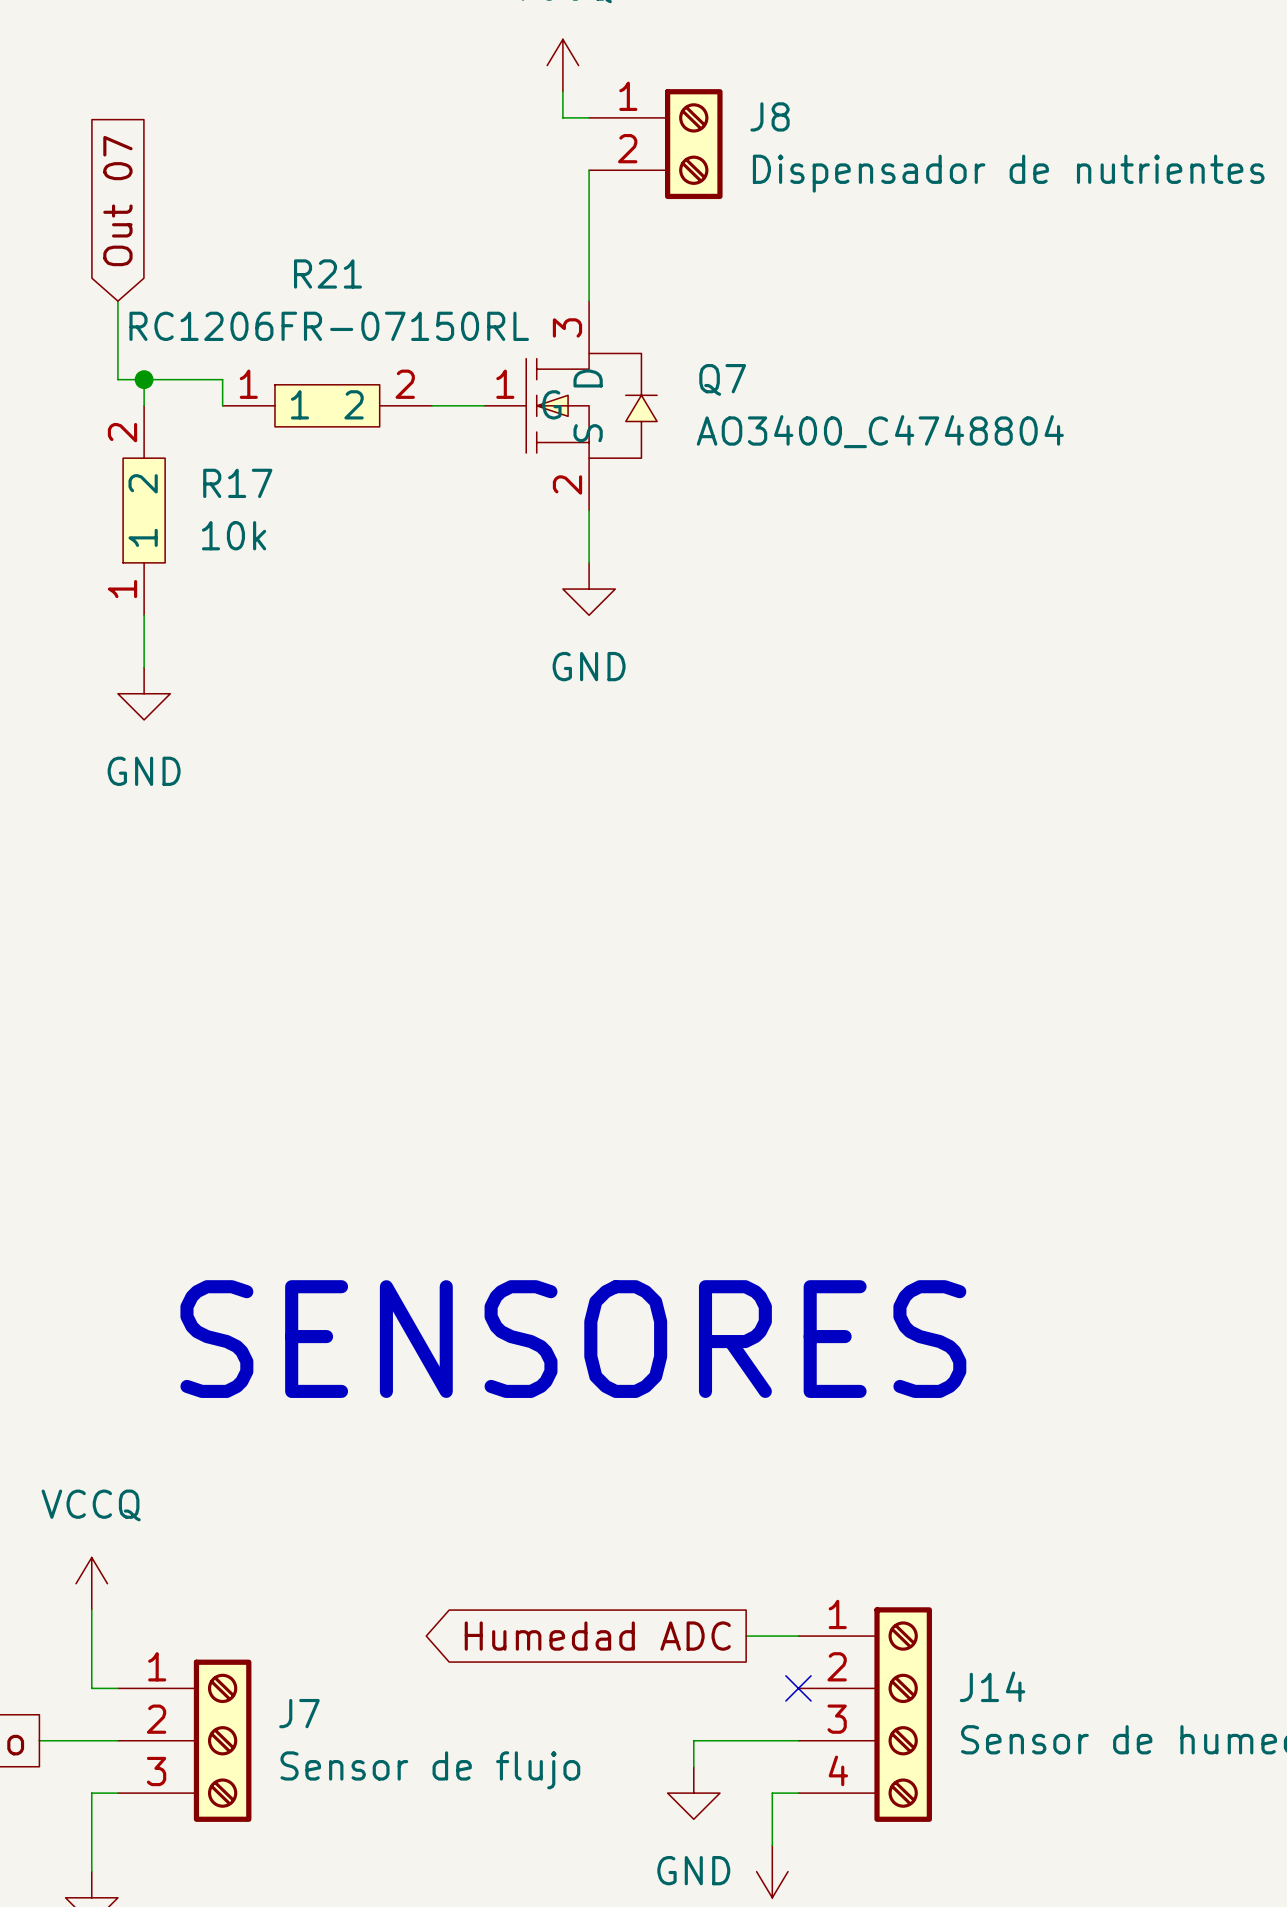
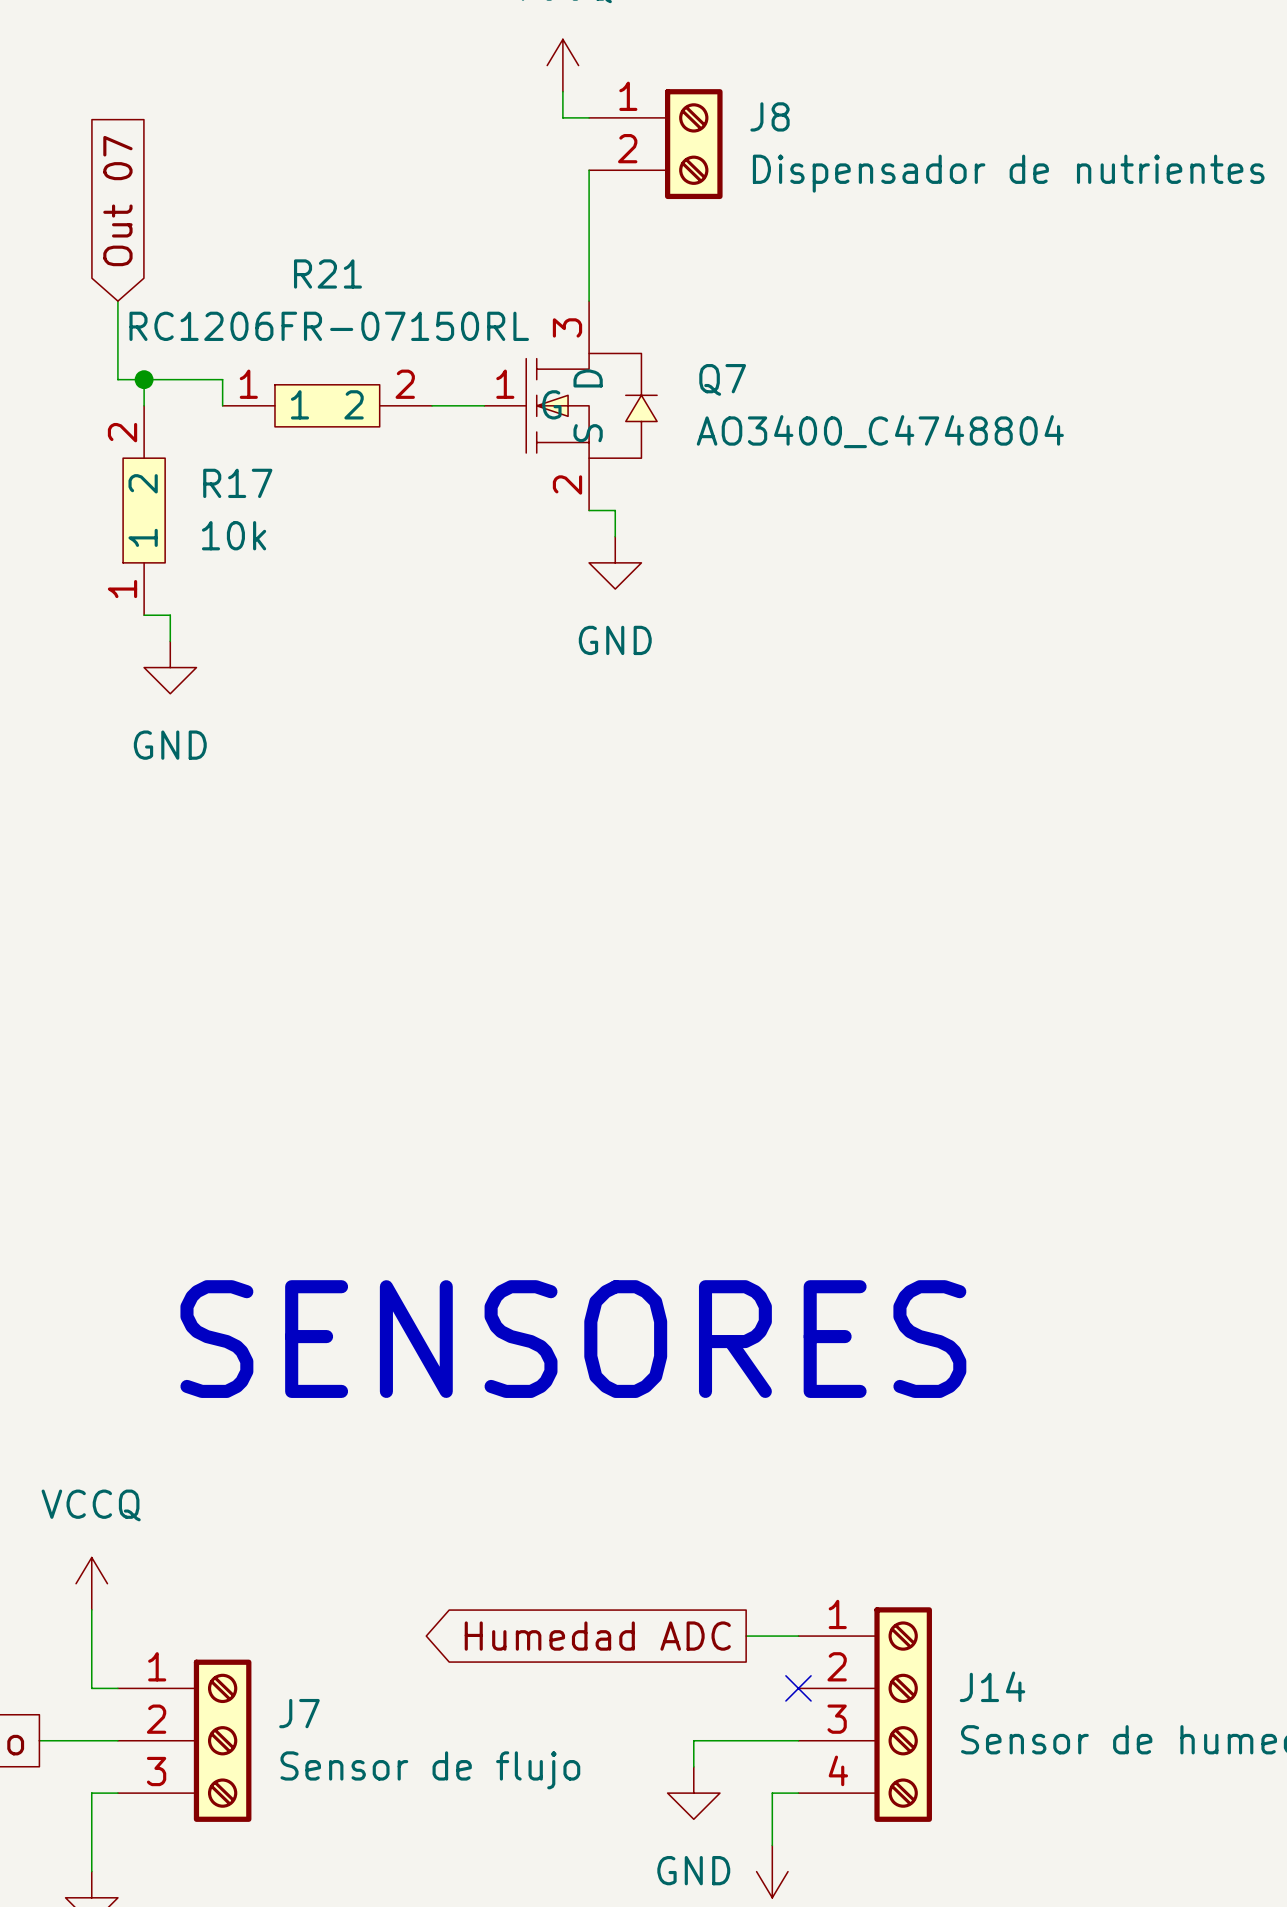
wire: (589, 510) (589, 562) -> (589, 510) (615, 510) (615, 536)
power symbol position: GND (589, 589) -> GND (615, 562)
wire: (144, 615) (144, 667) -> (144, 615) (170, 615) (170, 641)
power symbol position: GND (144, 693) -> GND (170, 667)

